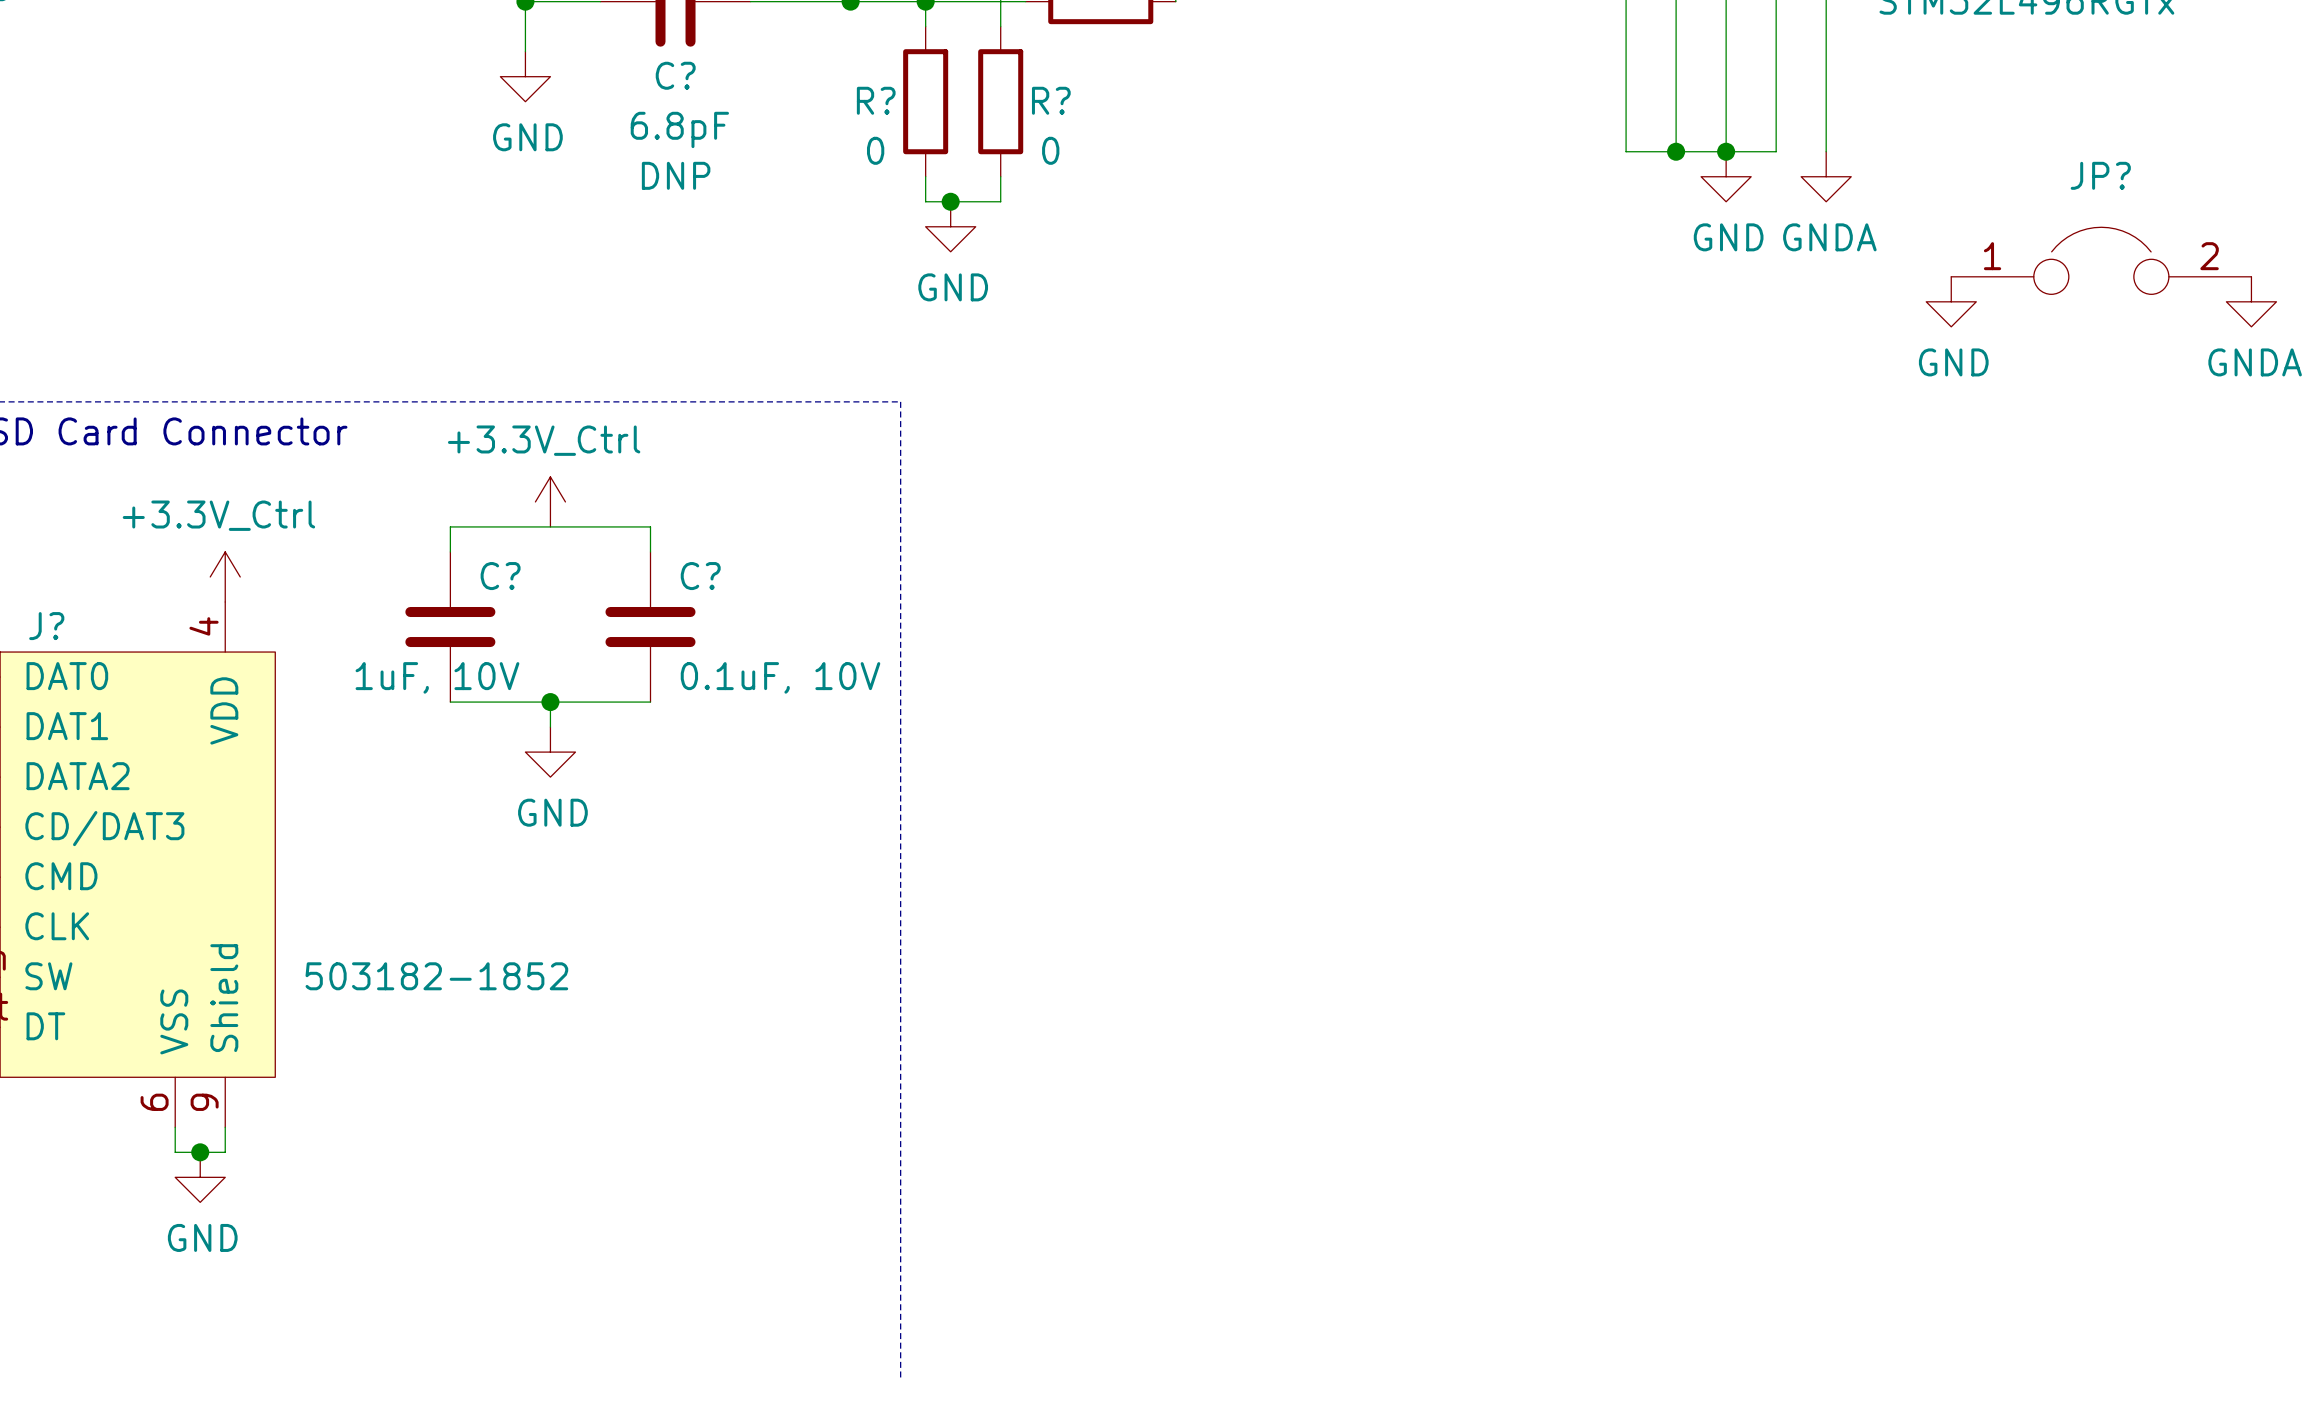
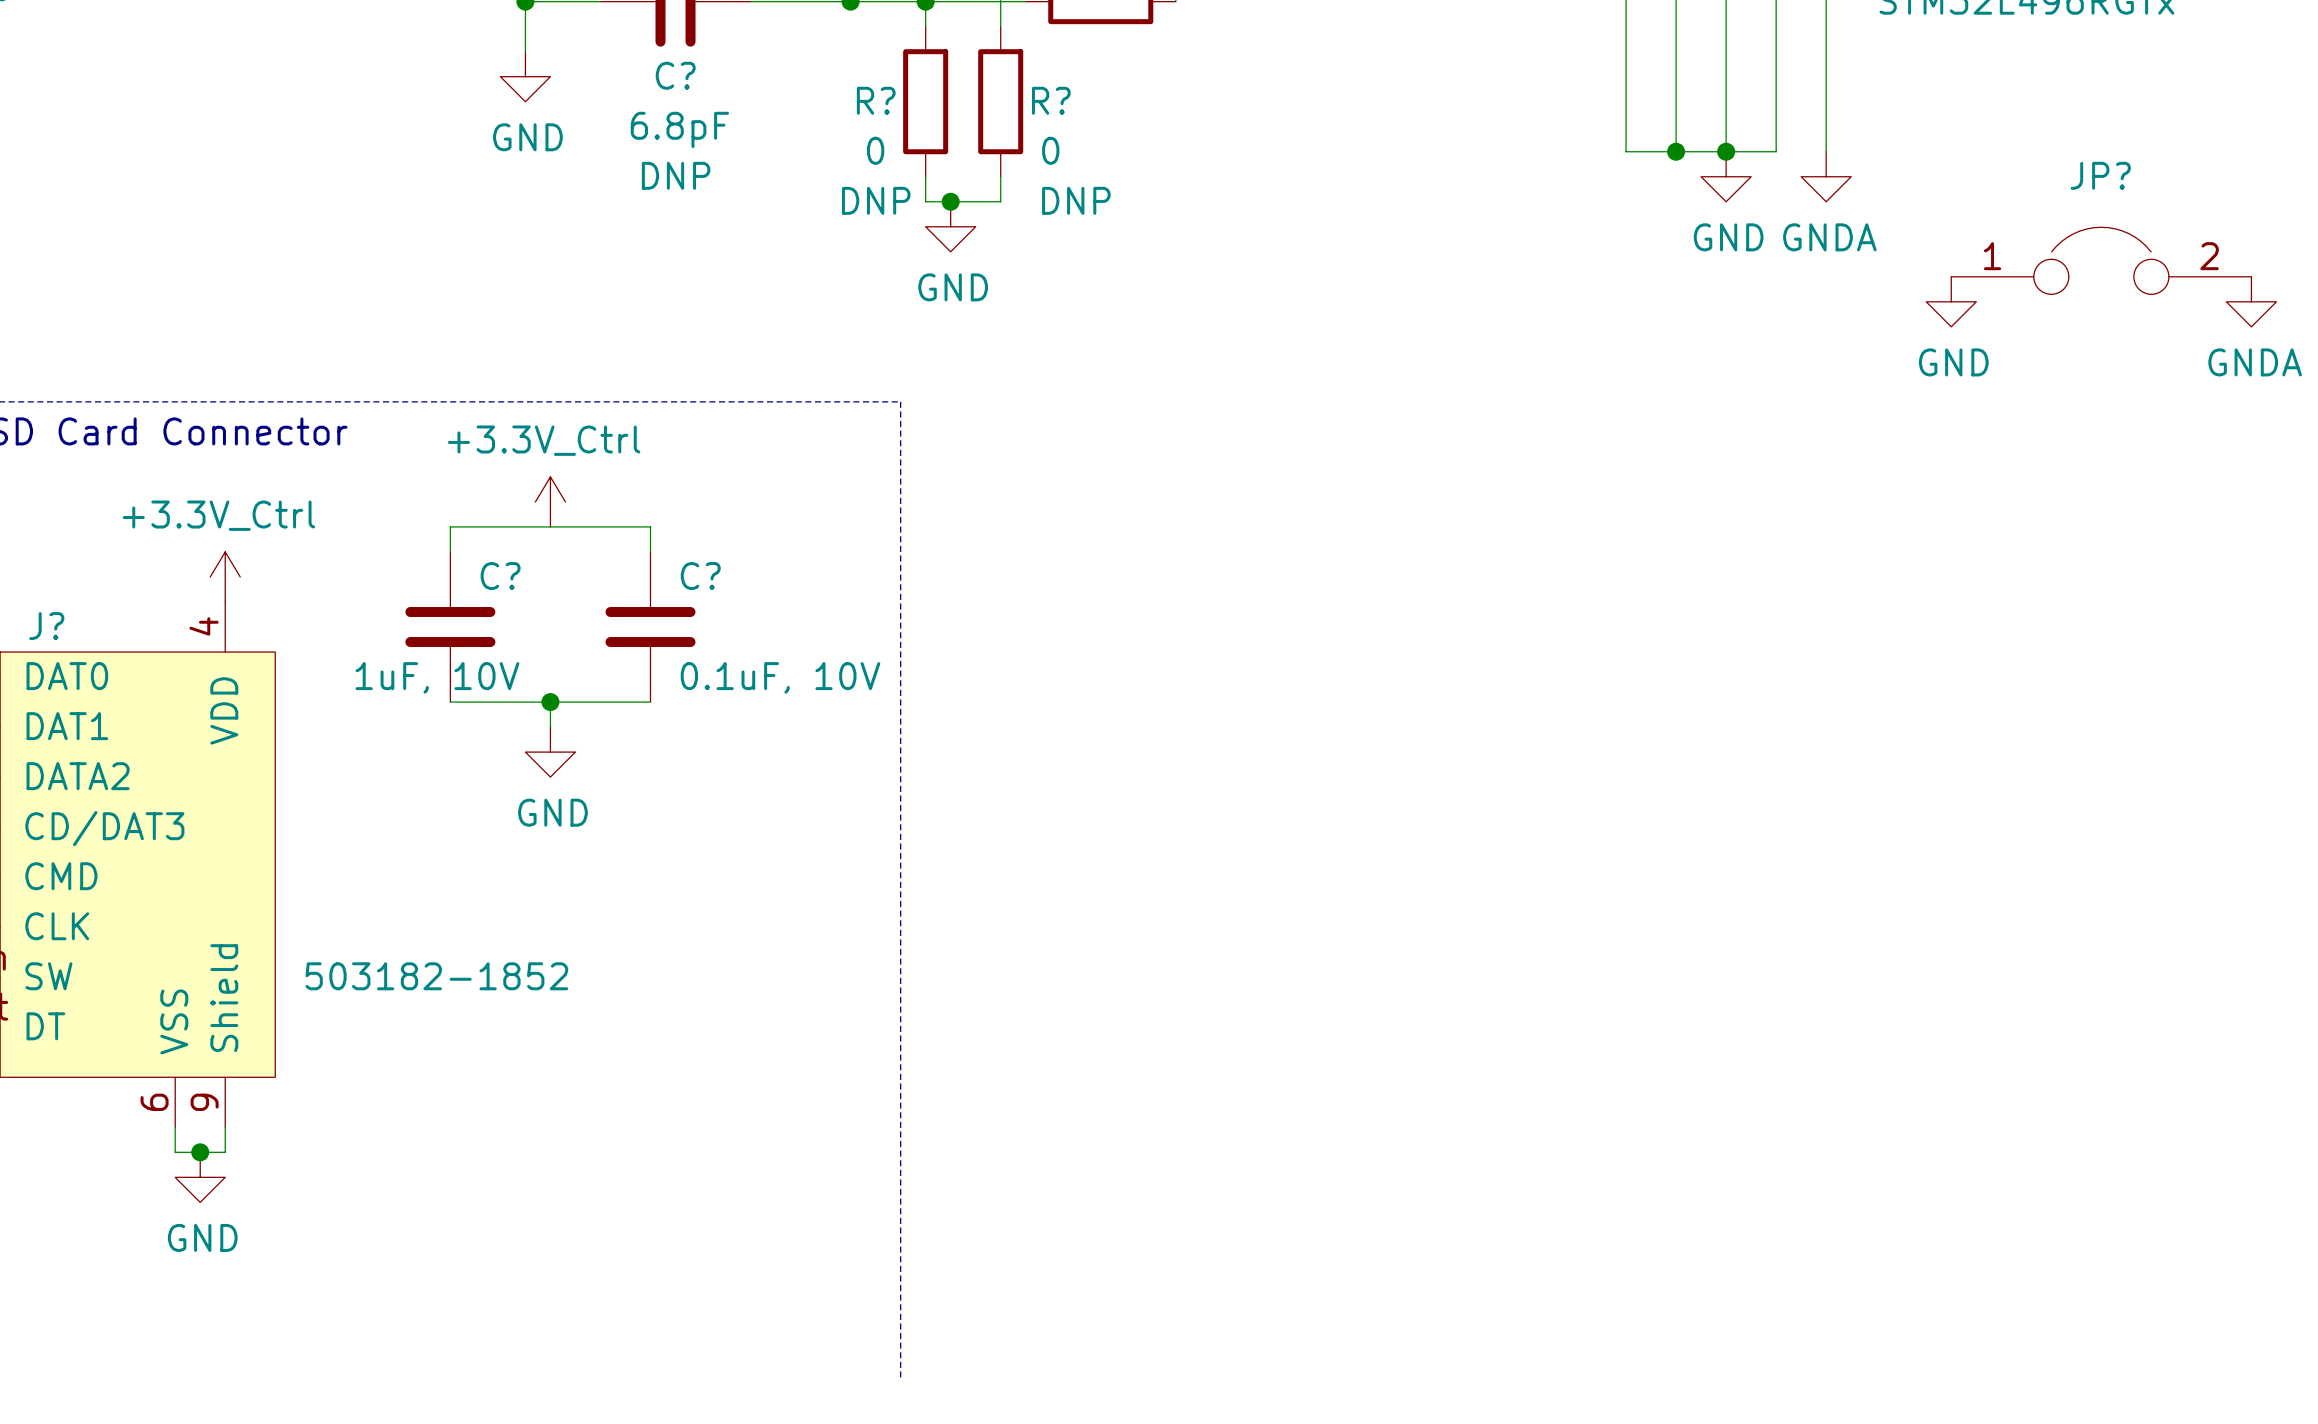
R? text: none -> DNP (876, 200)
R? text: none -> DNP (1076, 200)

